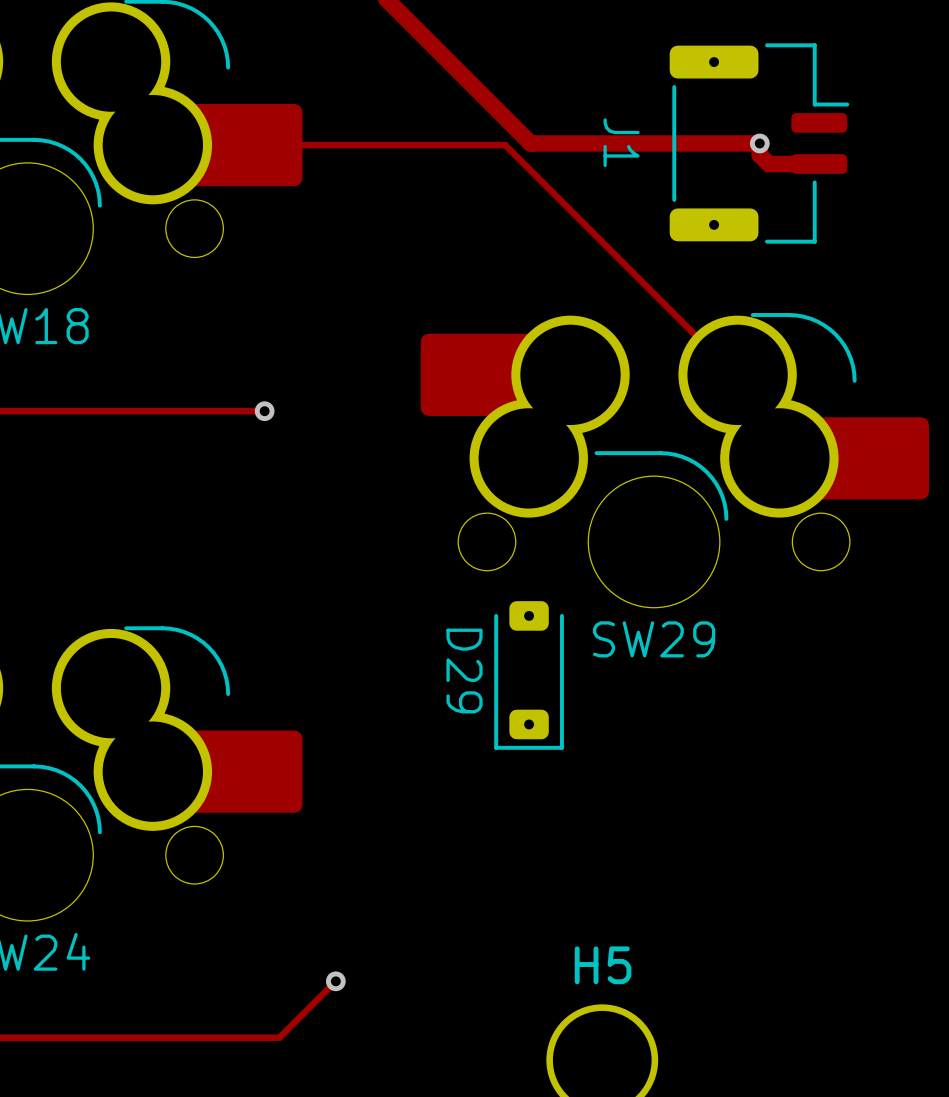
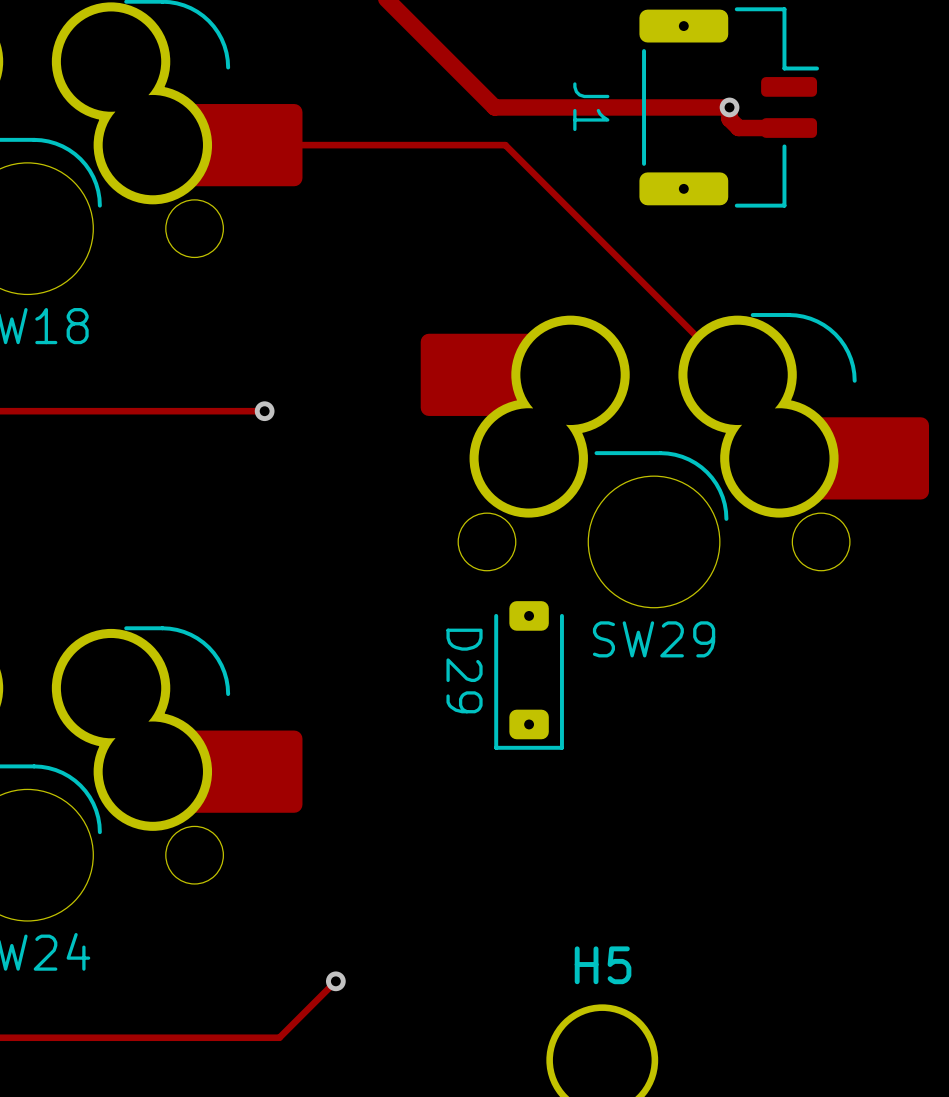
track: (494, 107) (530, 143) (759, 143) (759, 154) (768, 164) (819, 164) -> (494, 107) (729, 107) (729, 118) (738, 128) (789, 128)
J1 position: (759, 143) -> (729, 107)
via position: (759, 143) -> (729, 107)

